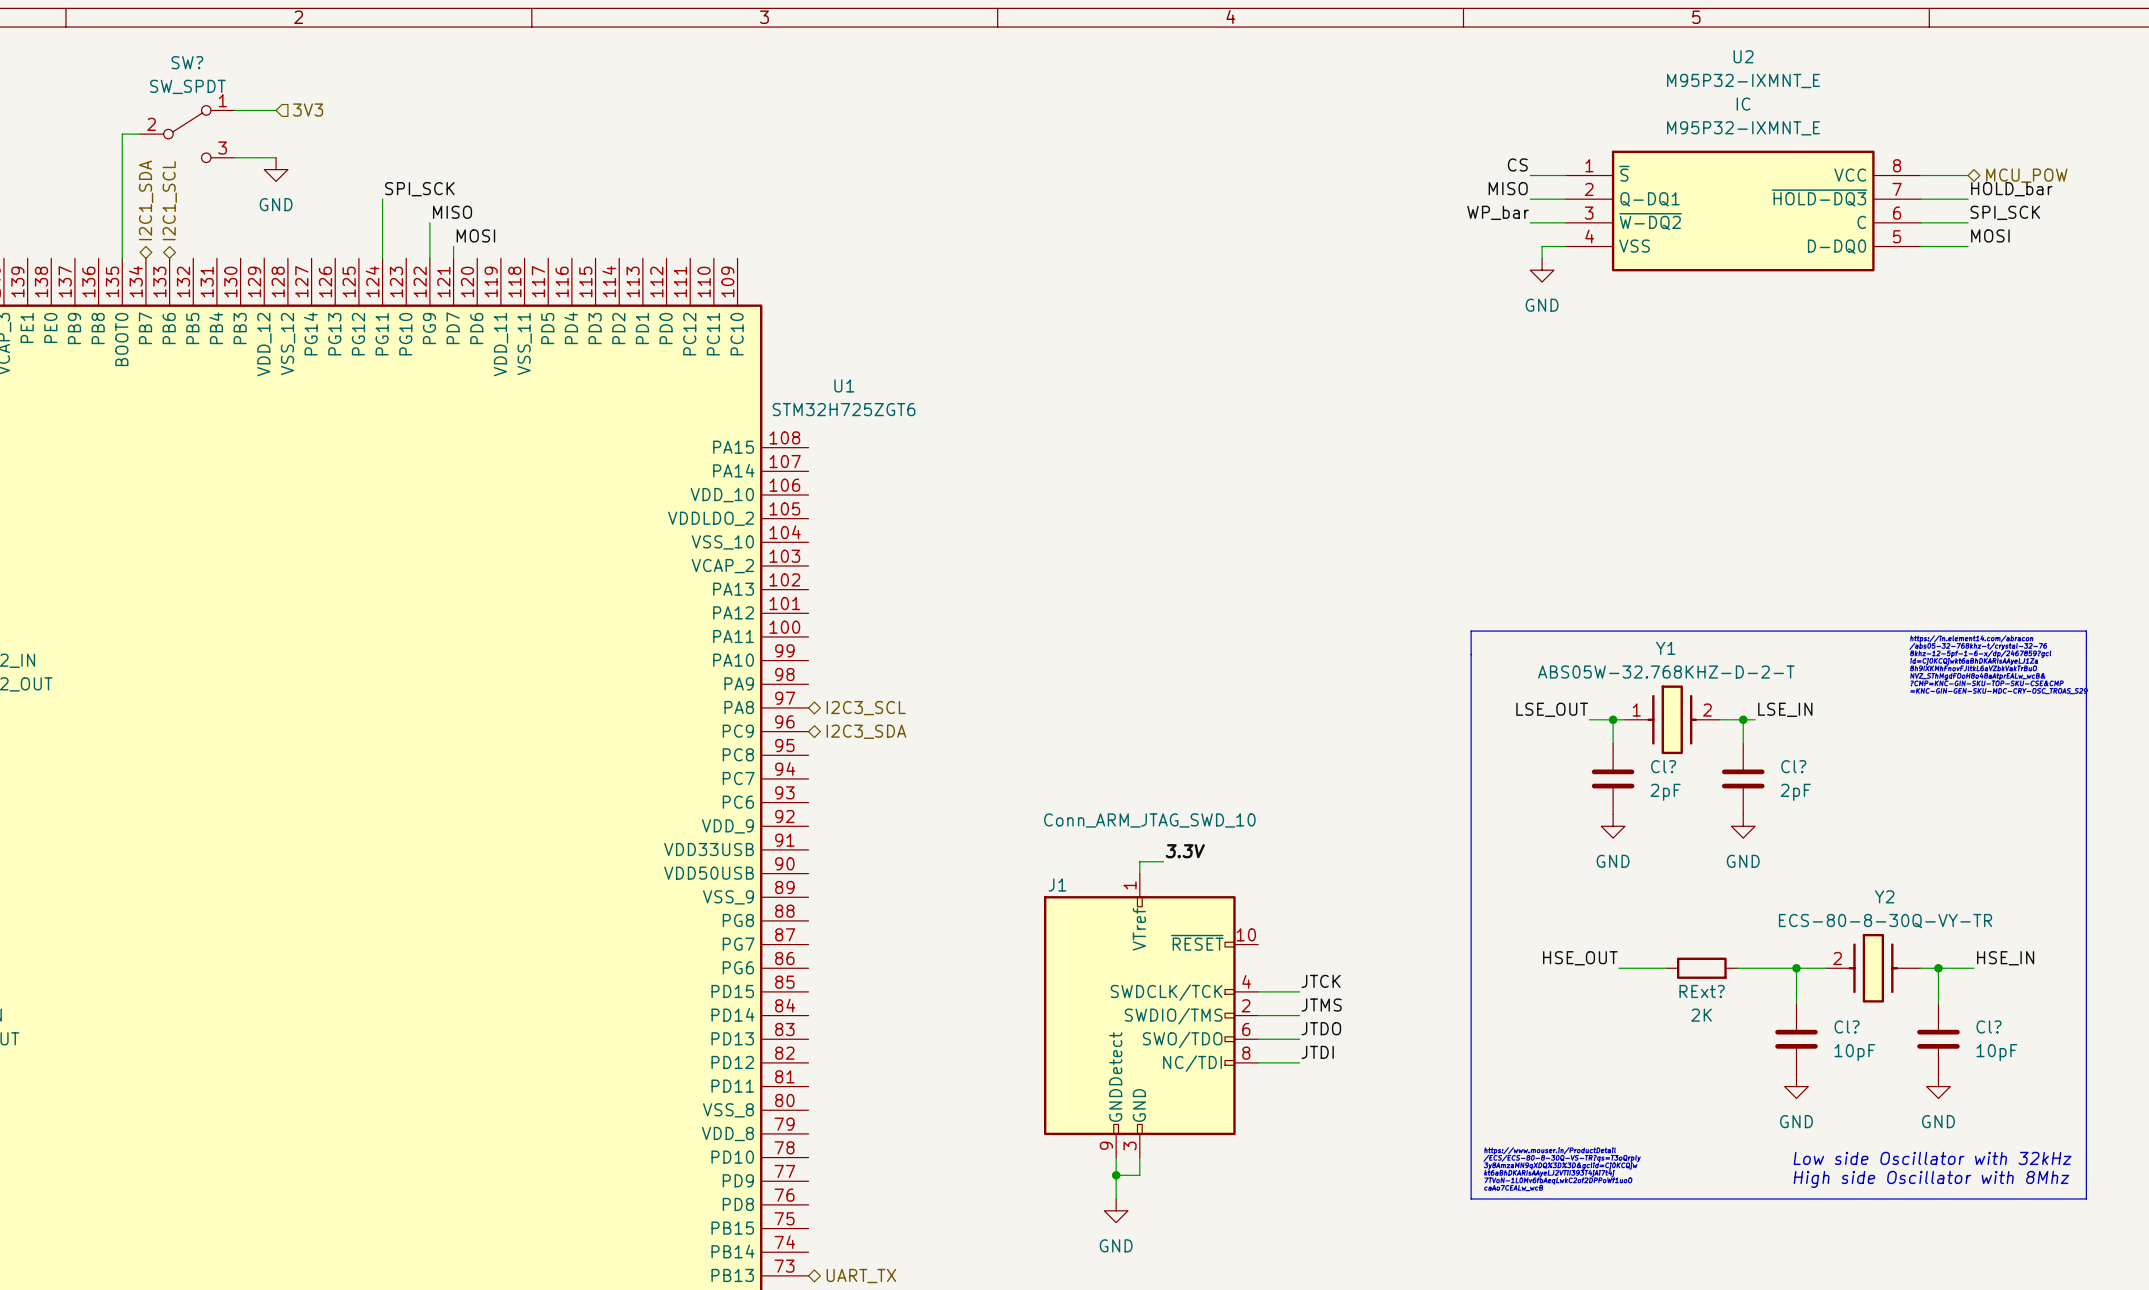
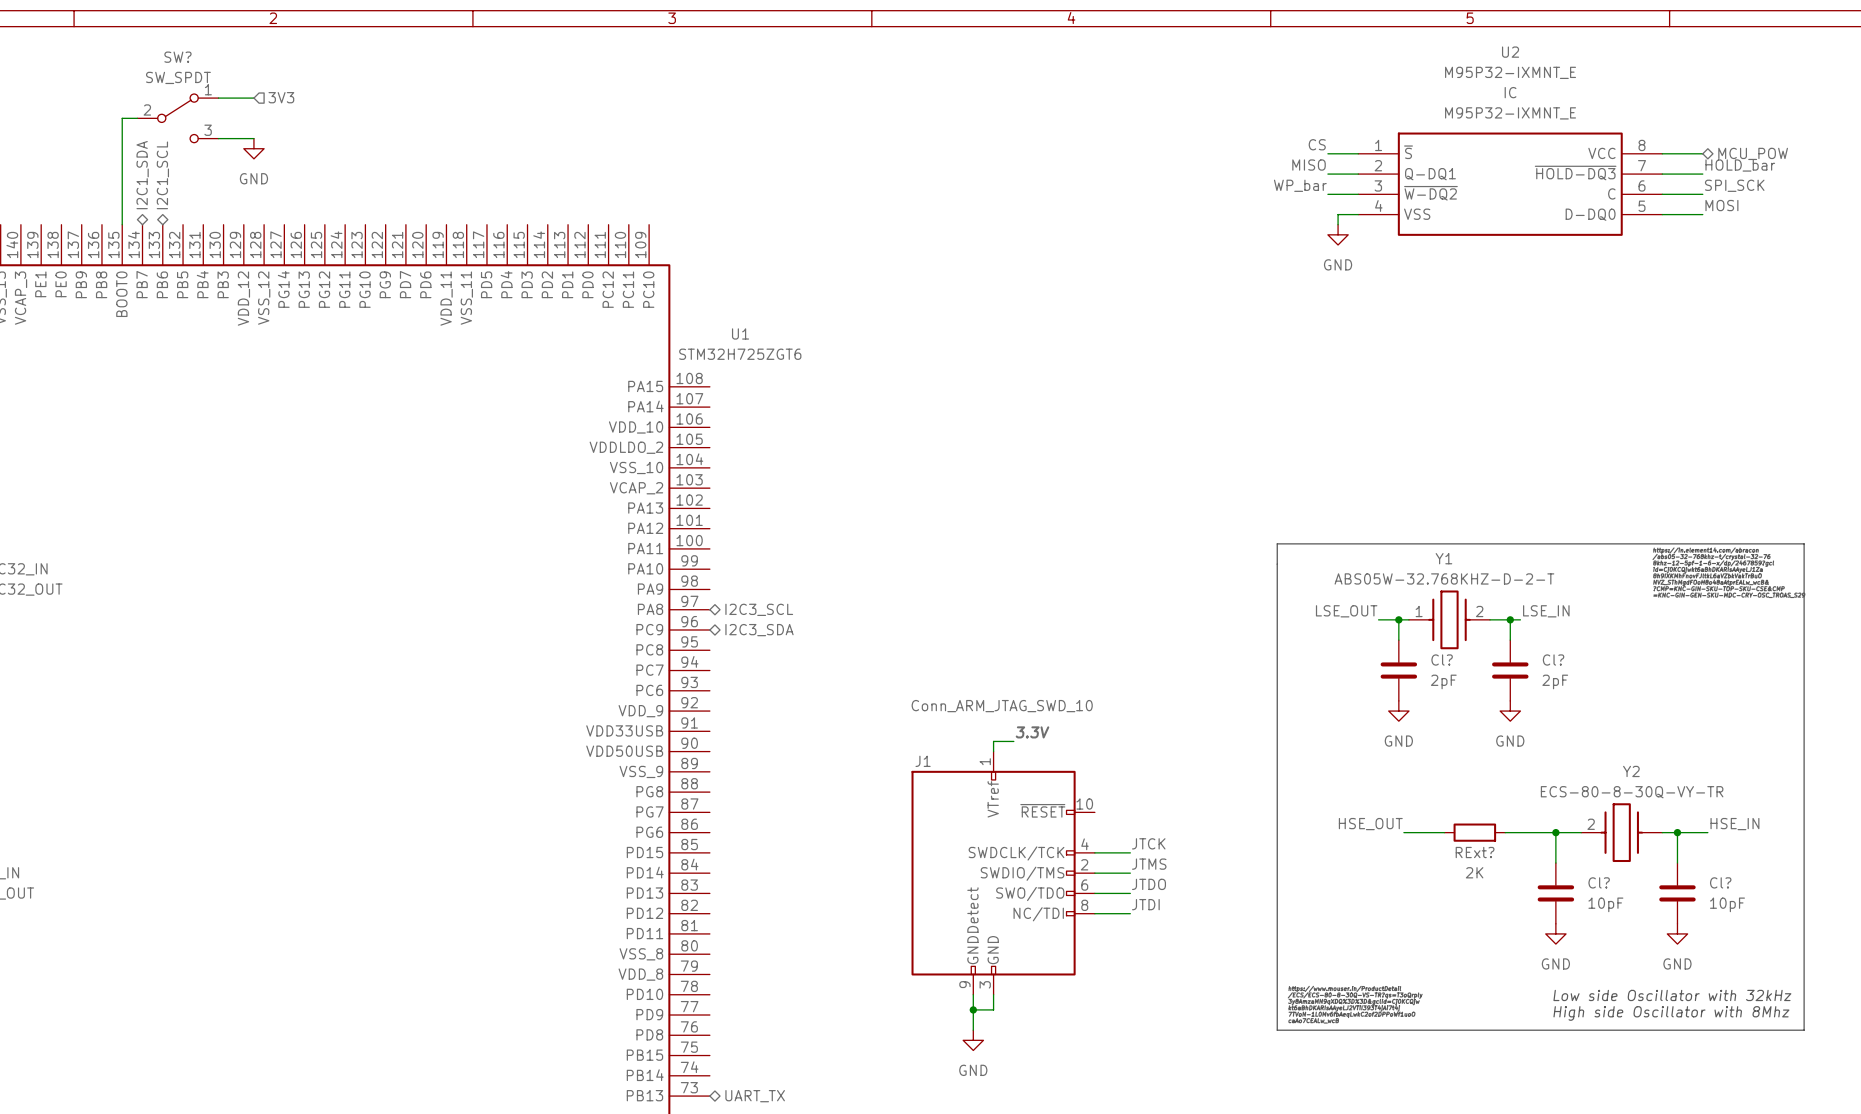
label: SPI_SCK (419, 189) -> none
wire: (382, 199) (382, 258) -> none
label: MISO (452, 212) -> none
wire: (429, 222) (429, 258) -> none
label: MOSI (475, 235) -> none
wire: (453, 246) (453, 258) -> none

